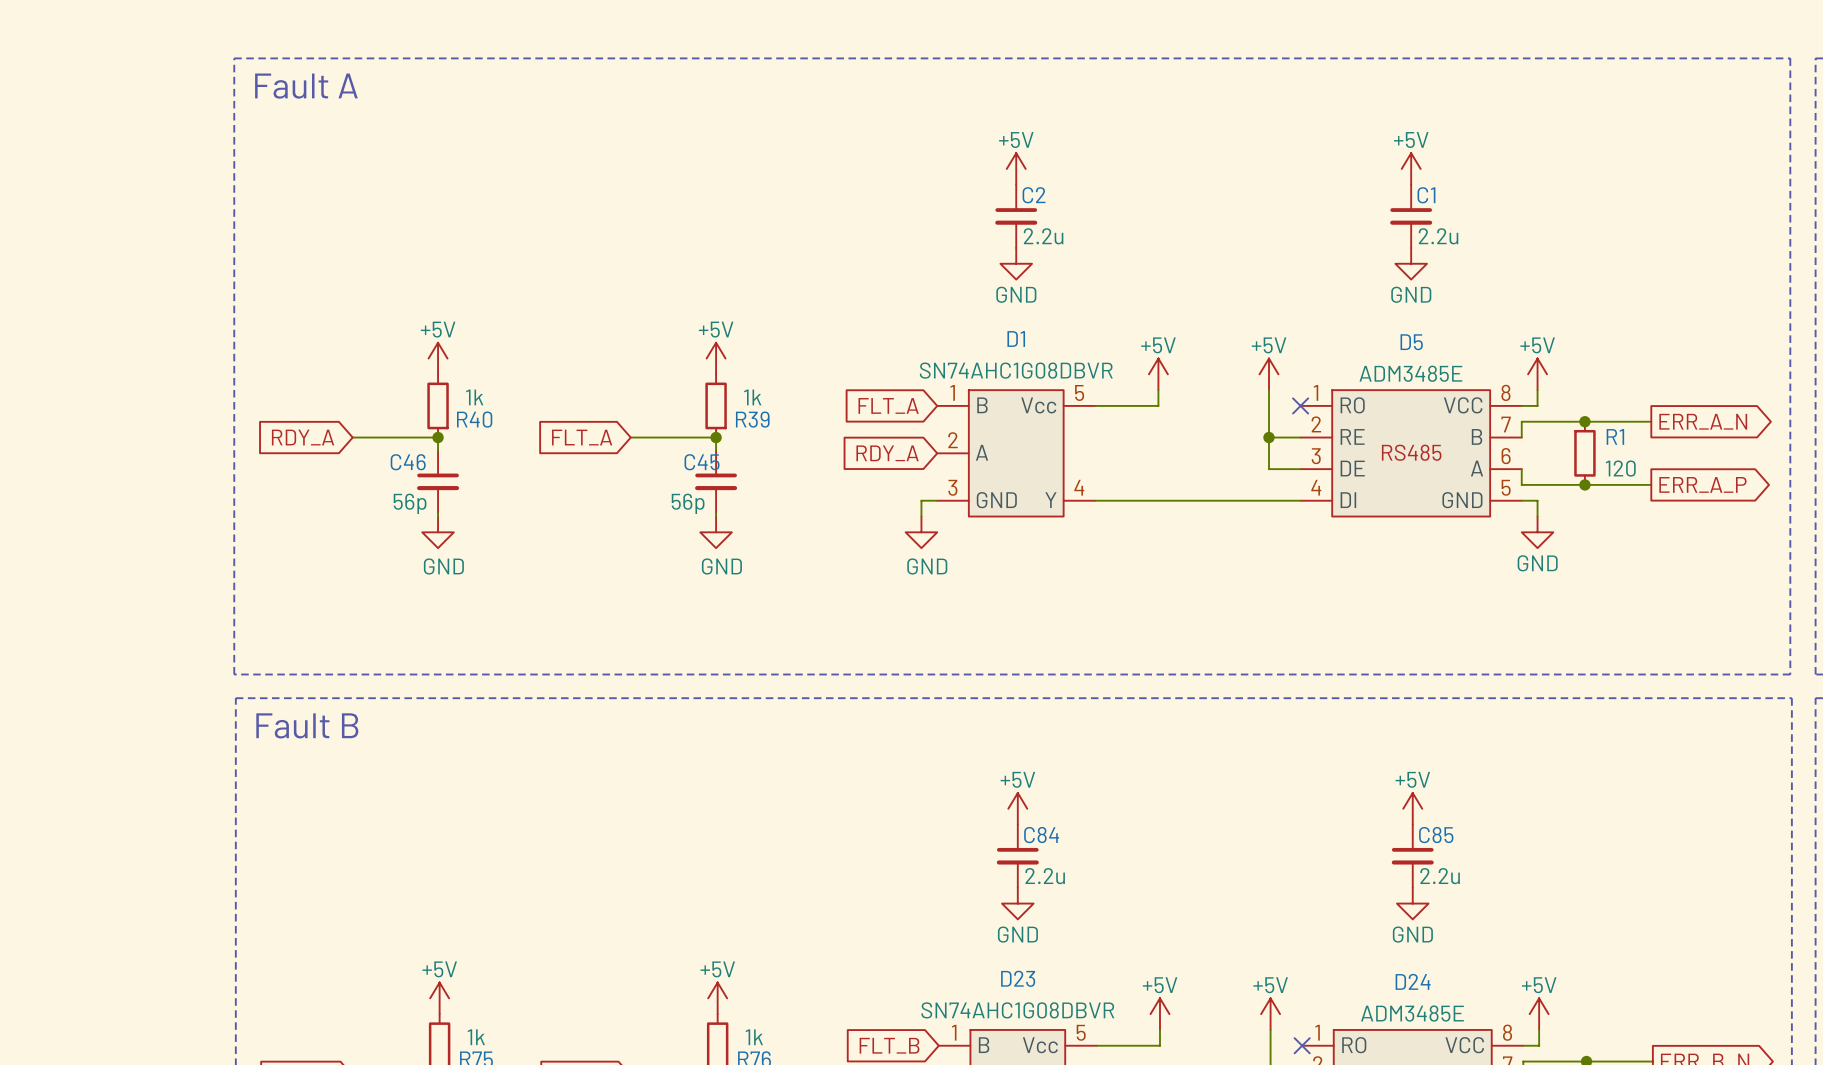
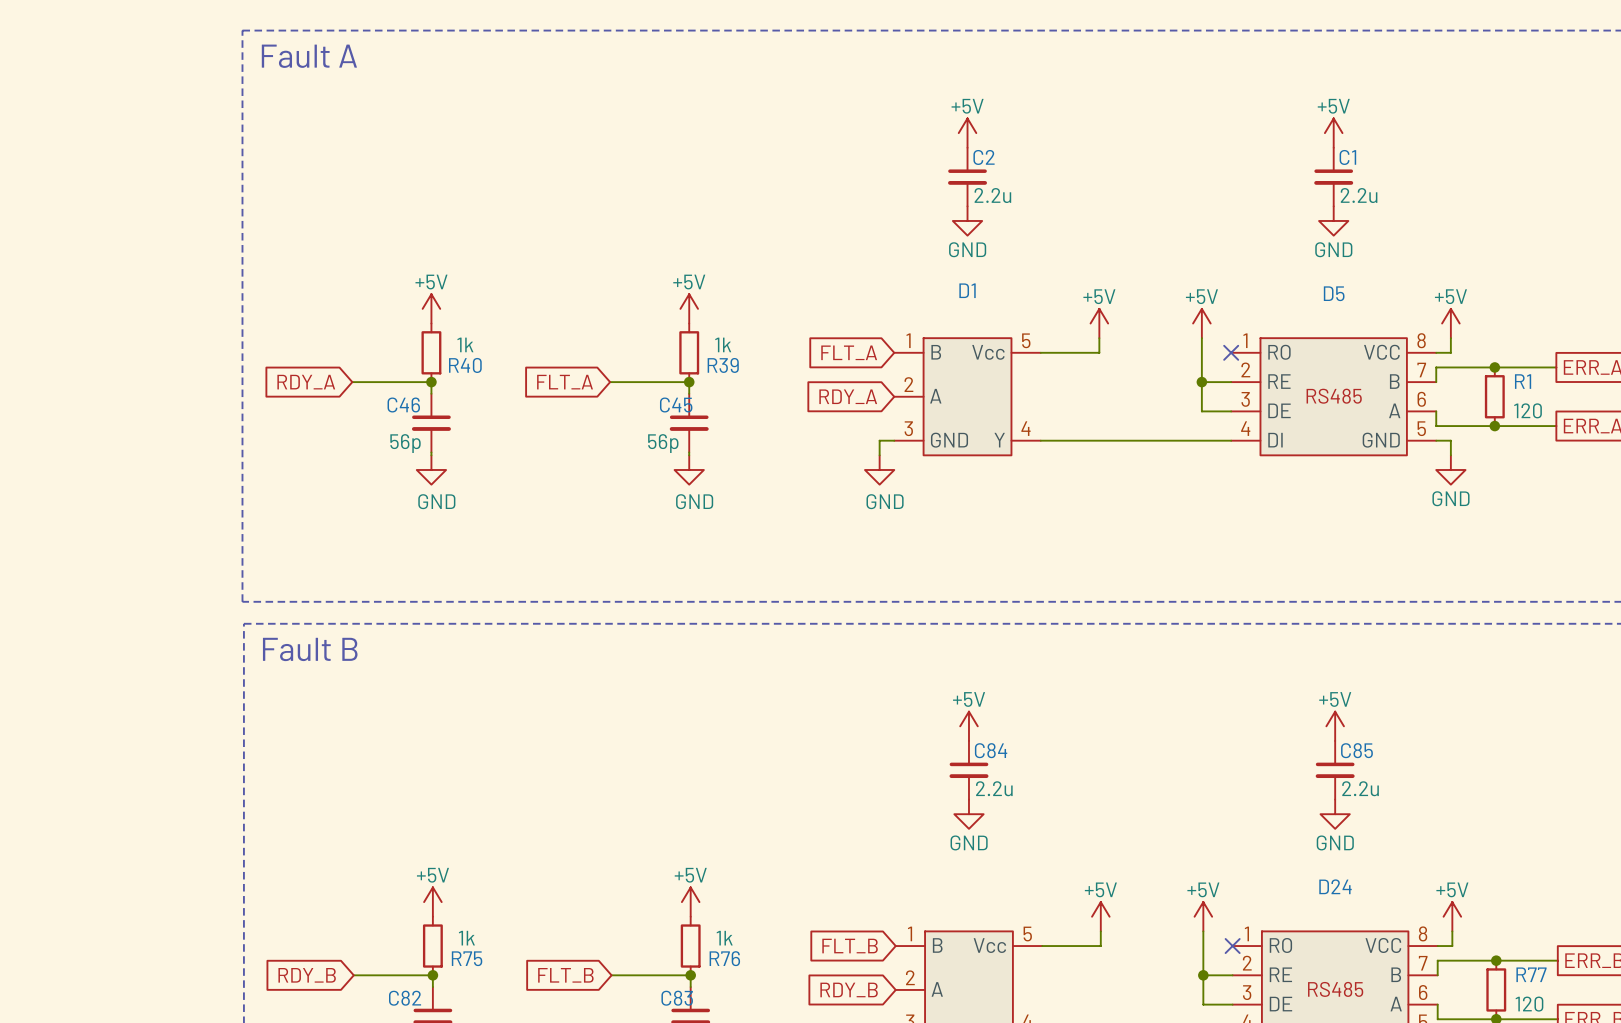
D1 value: SN74AHC1G08DBVR (1016, 370) -> none
D5 value: ADM3485E (1410, 373) -> none
D23 name: D23 (1018, 978) -> none
D23 value: SN74AHC1G08DBVR (1017, 1010) -> none
D24 value: ADM3485E (1412, 1013) -> none

